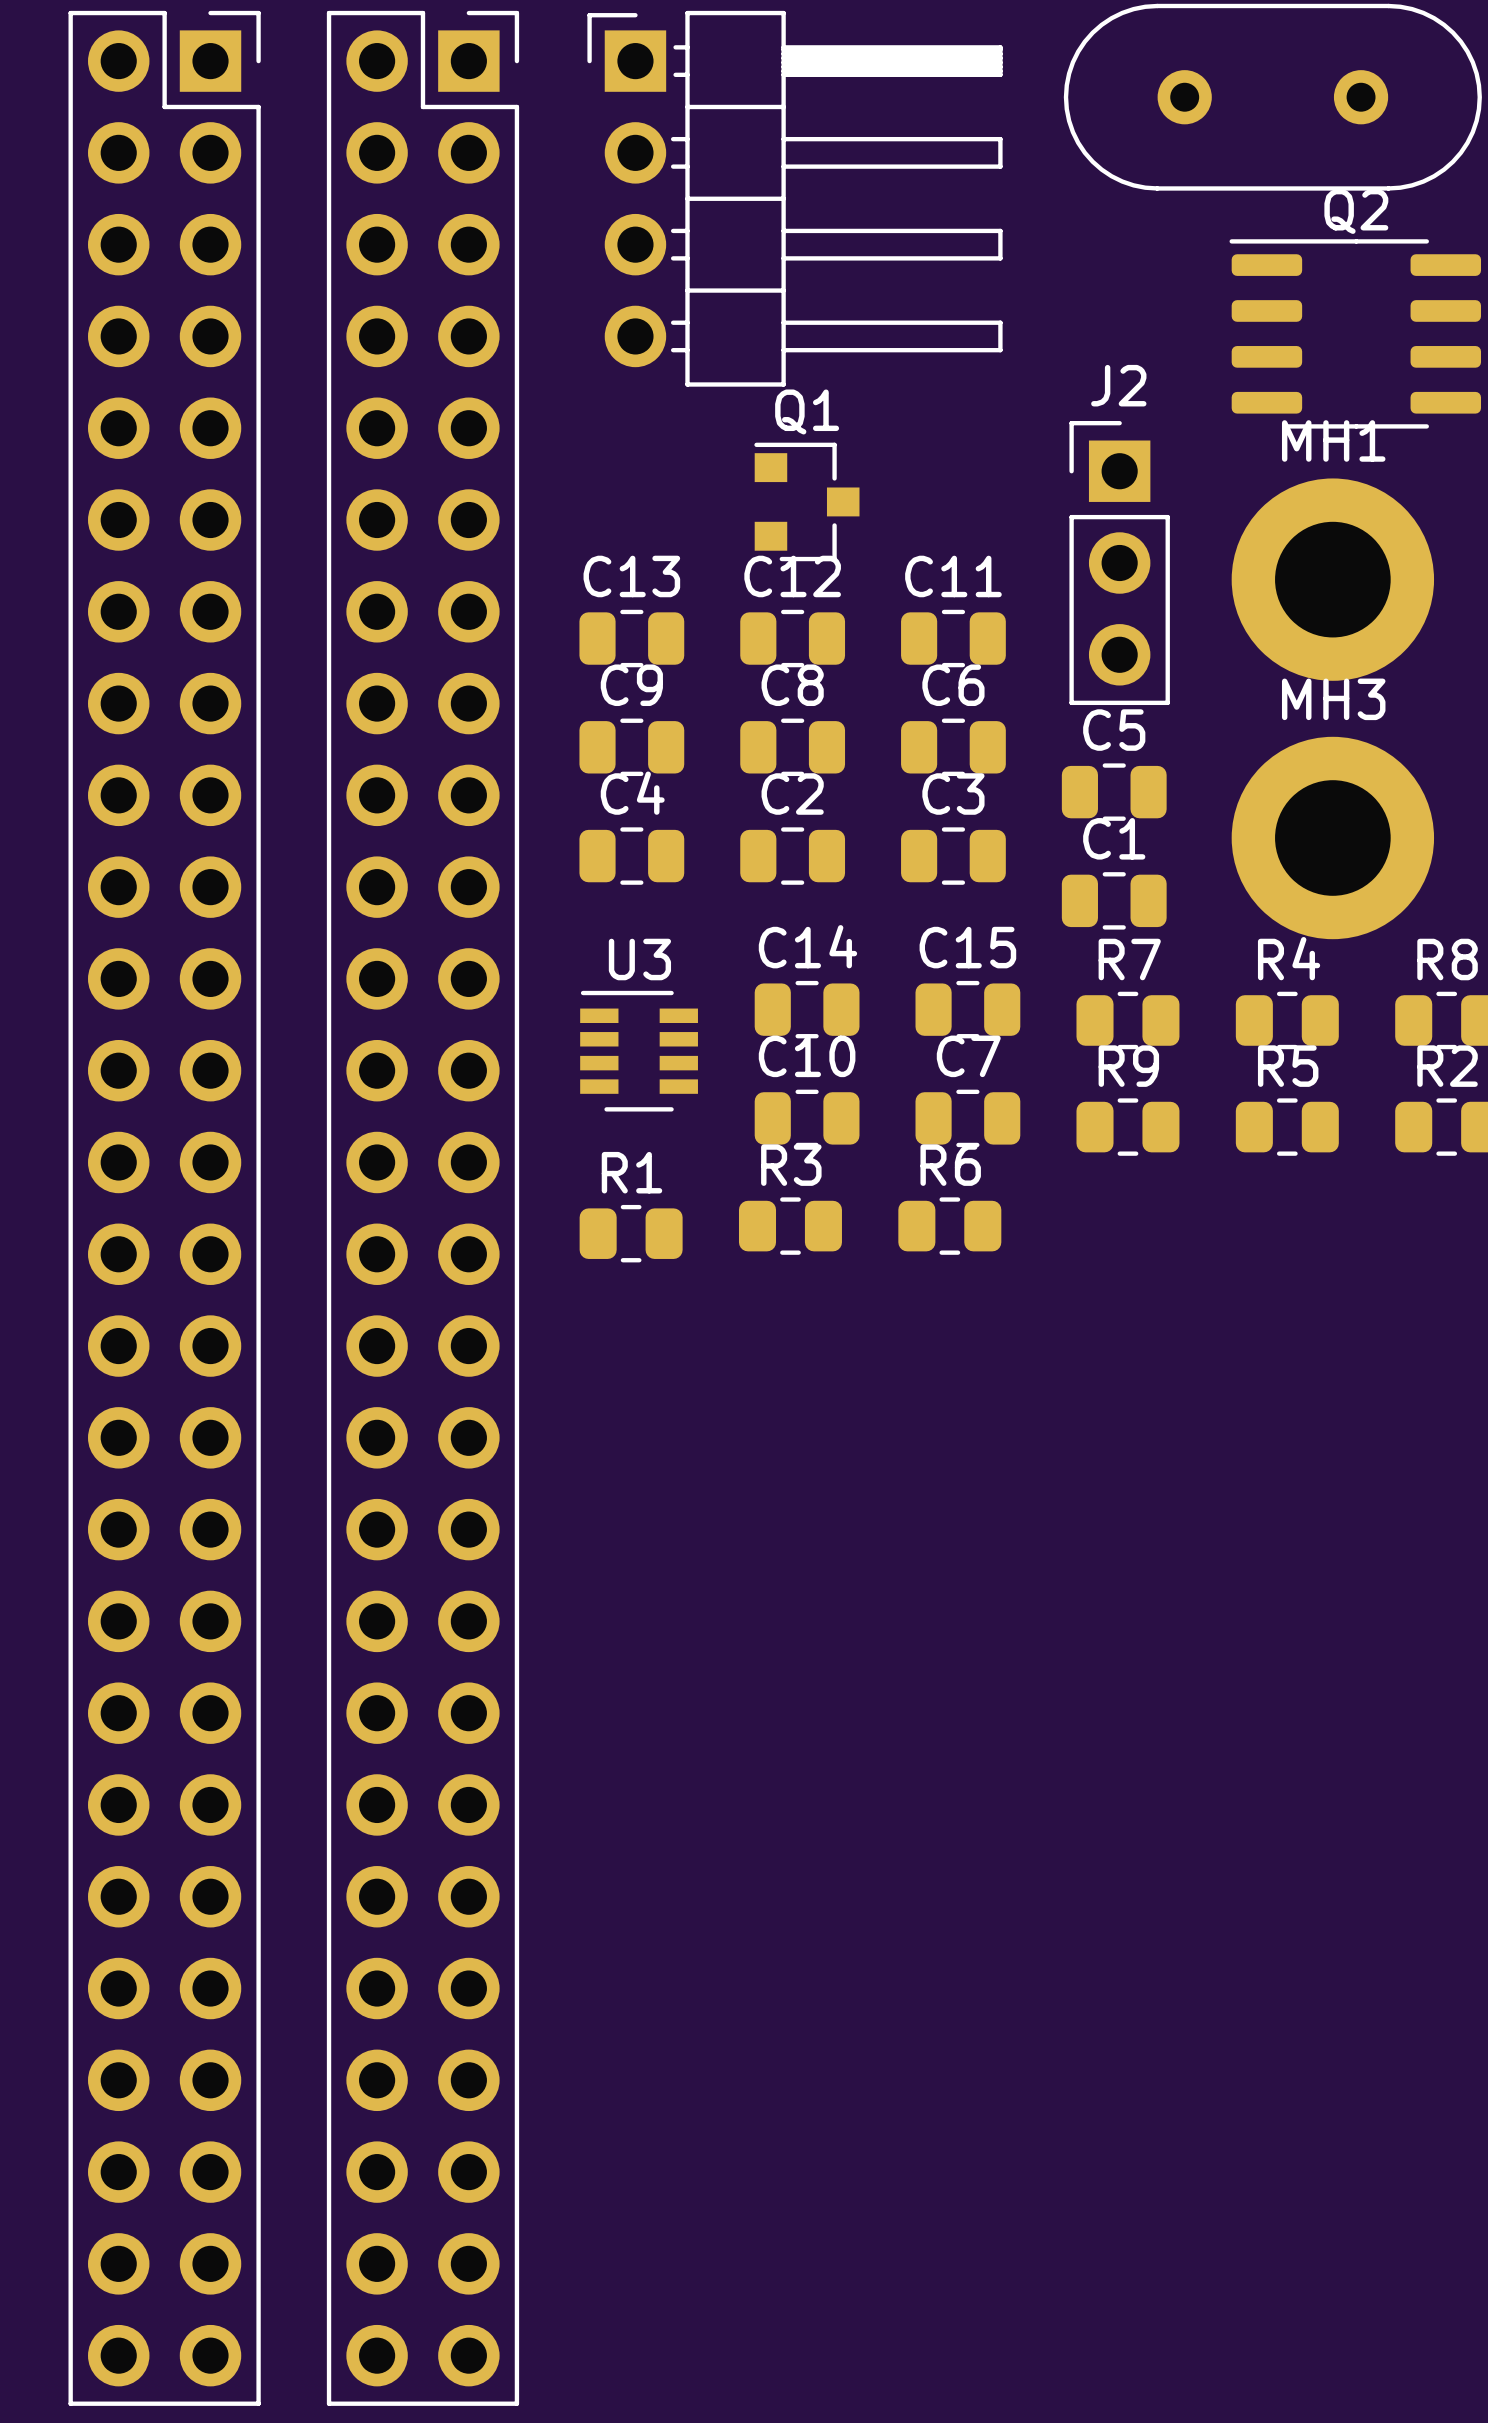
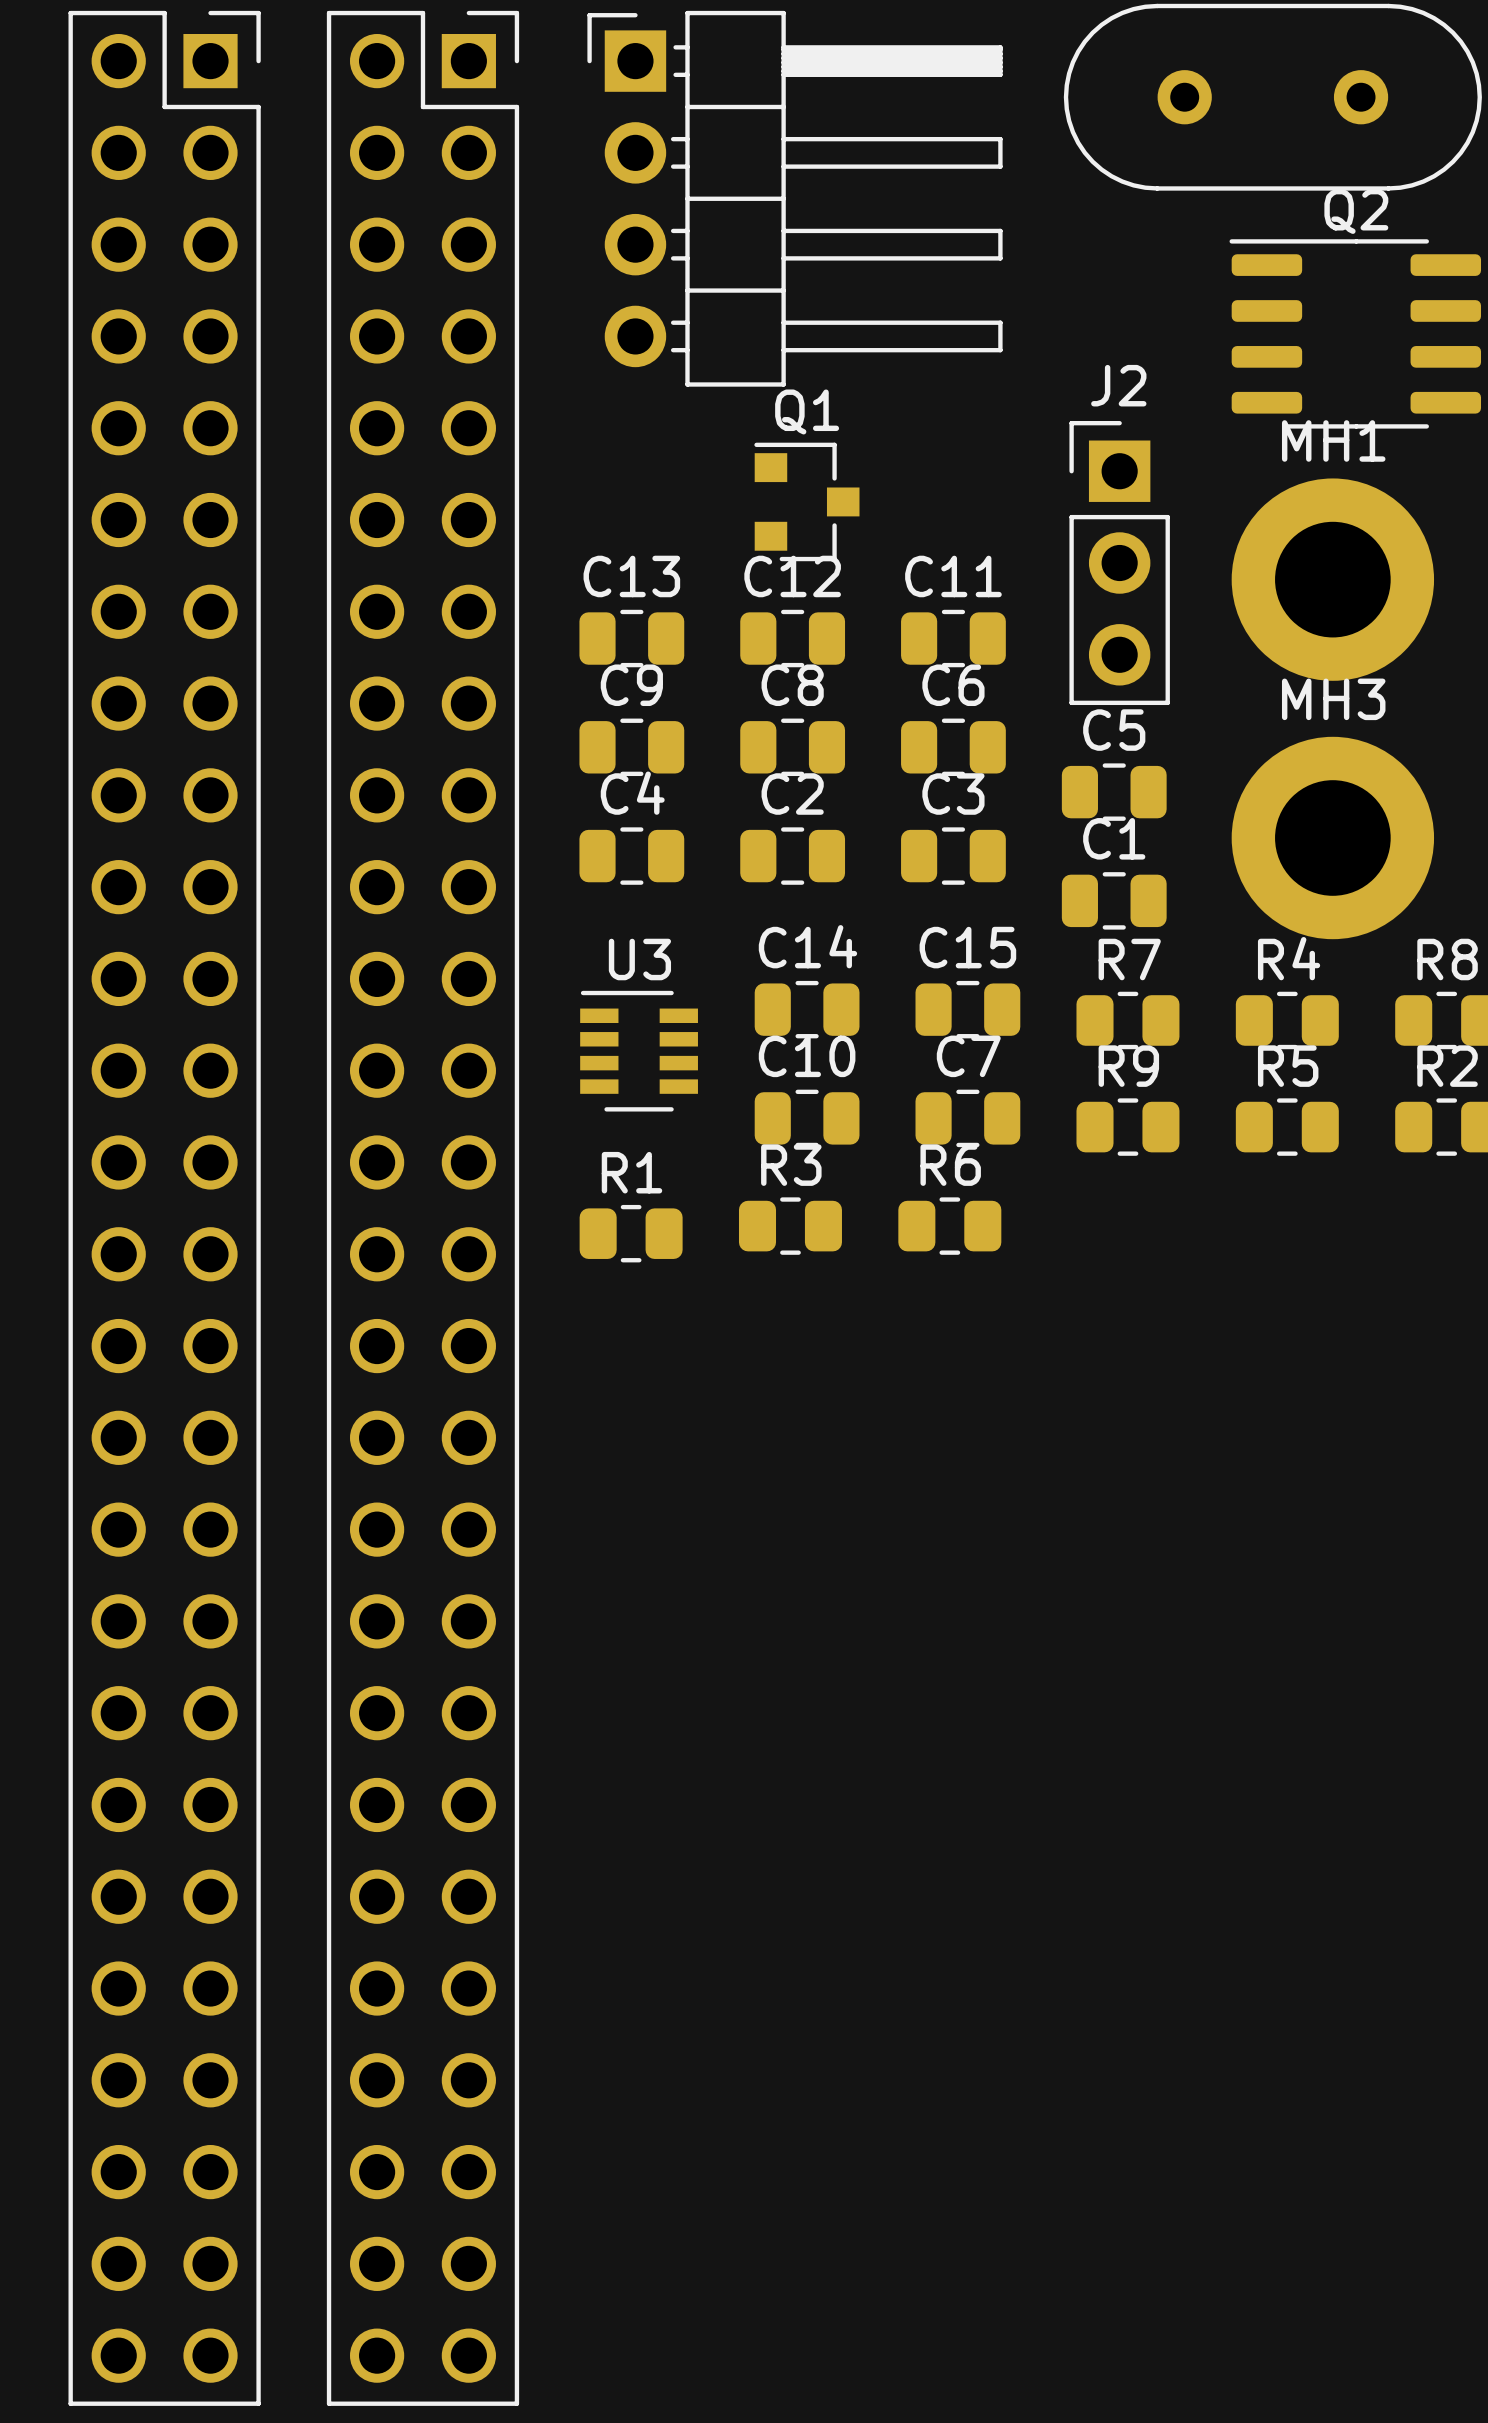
part footprint: [68, 10, 261, 2406] -> [68, 10, 261, 2406]
part footprint: [326, 10, 520, 2406] -> [326, 10, 520, 2406]

